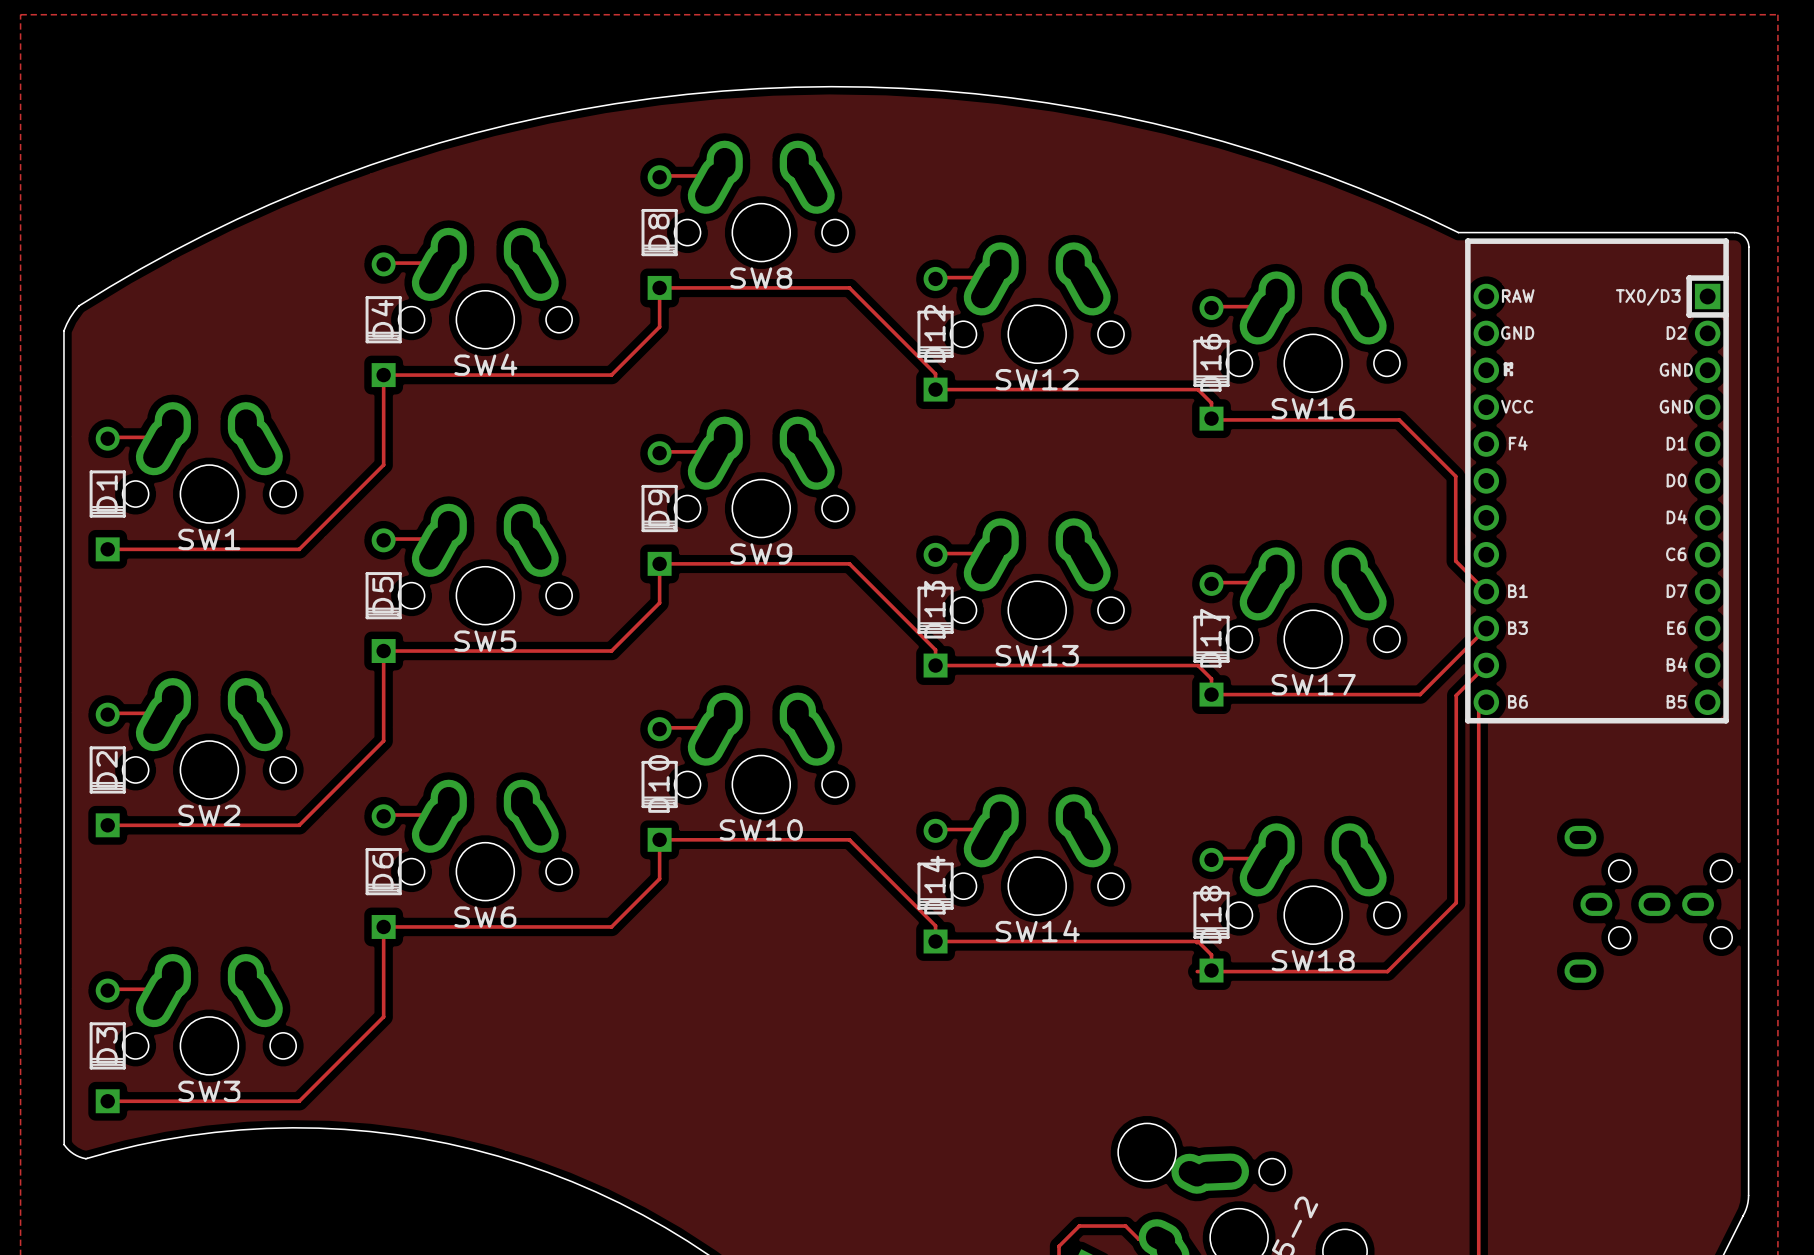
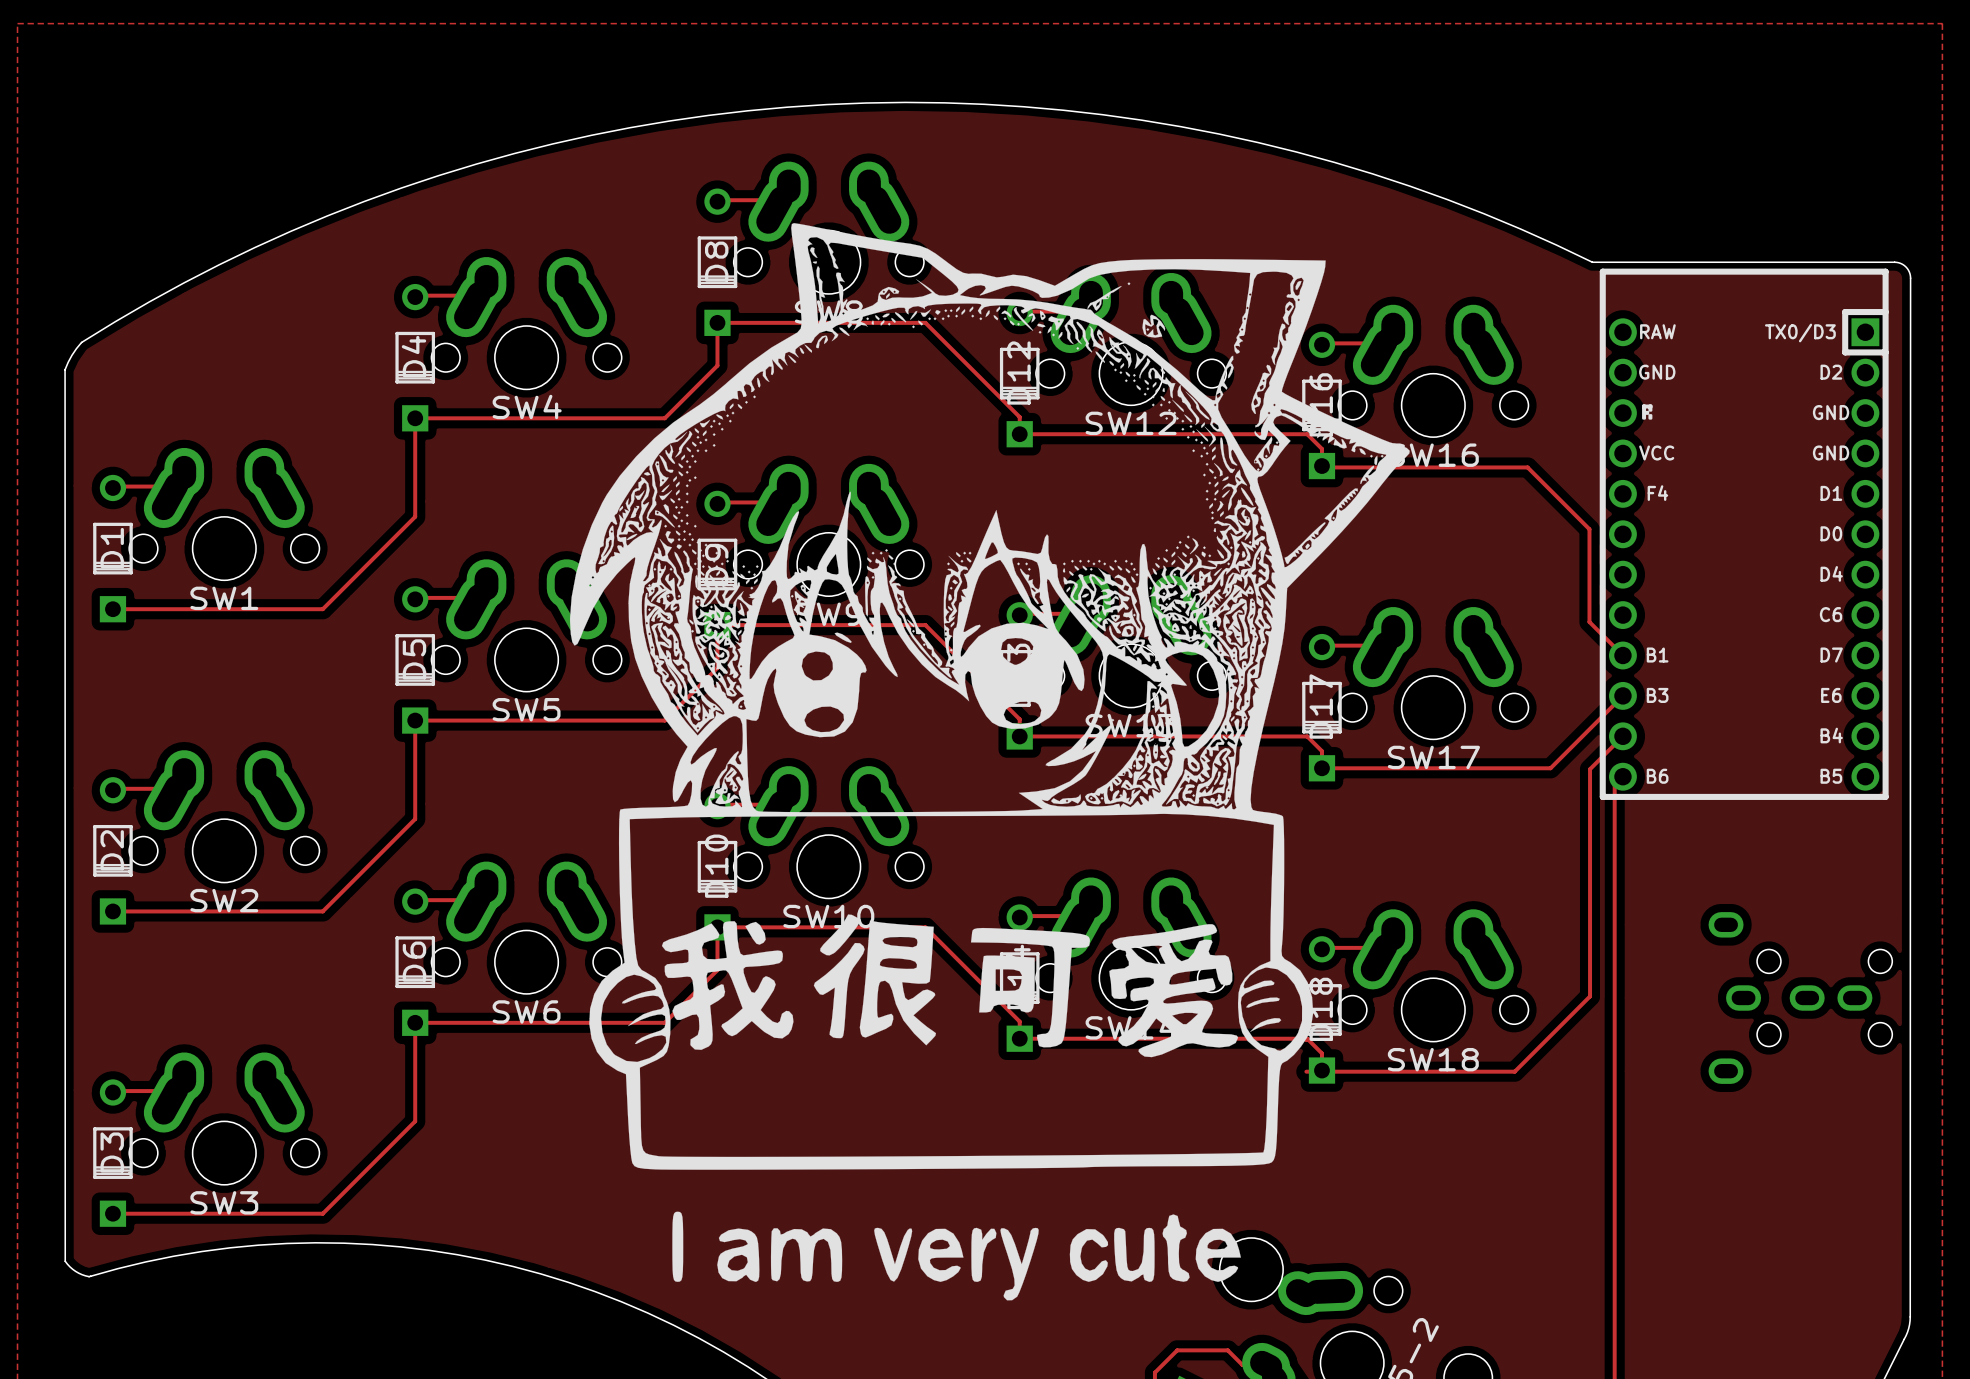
drawing: none -> [569, 223, 1410, 1301]

